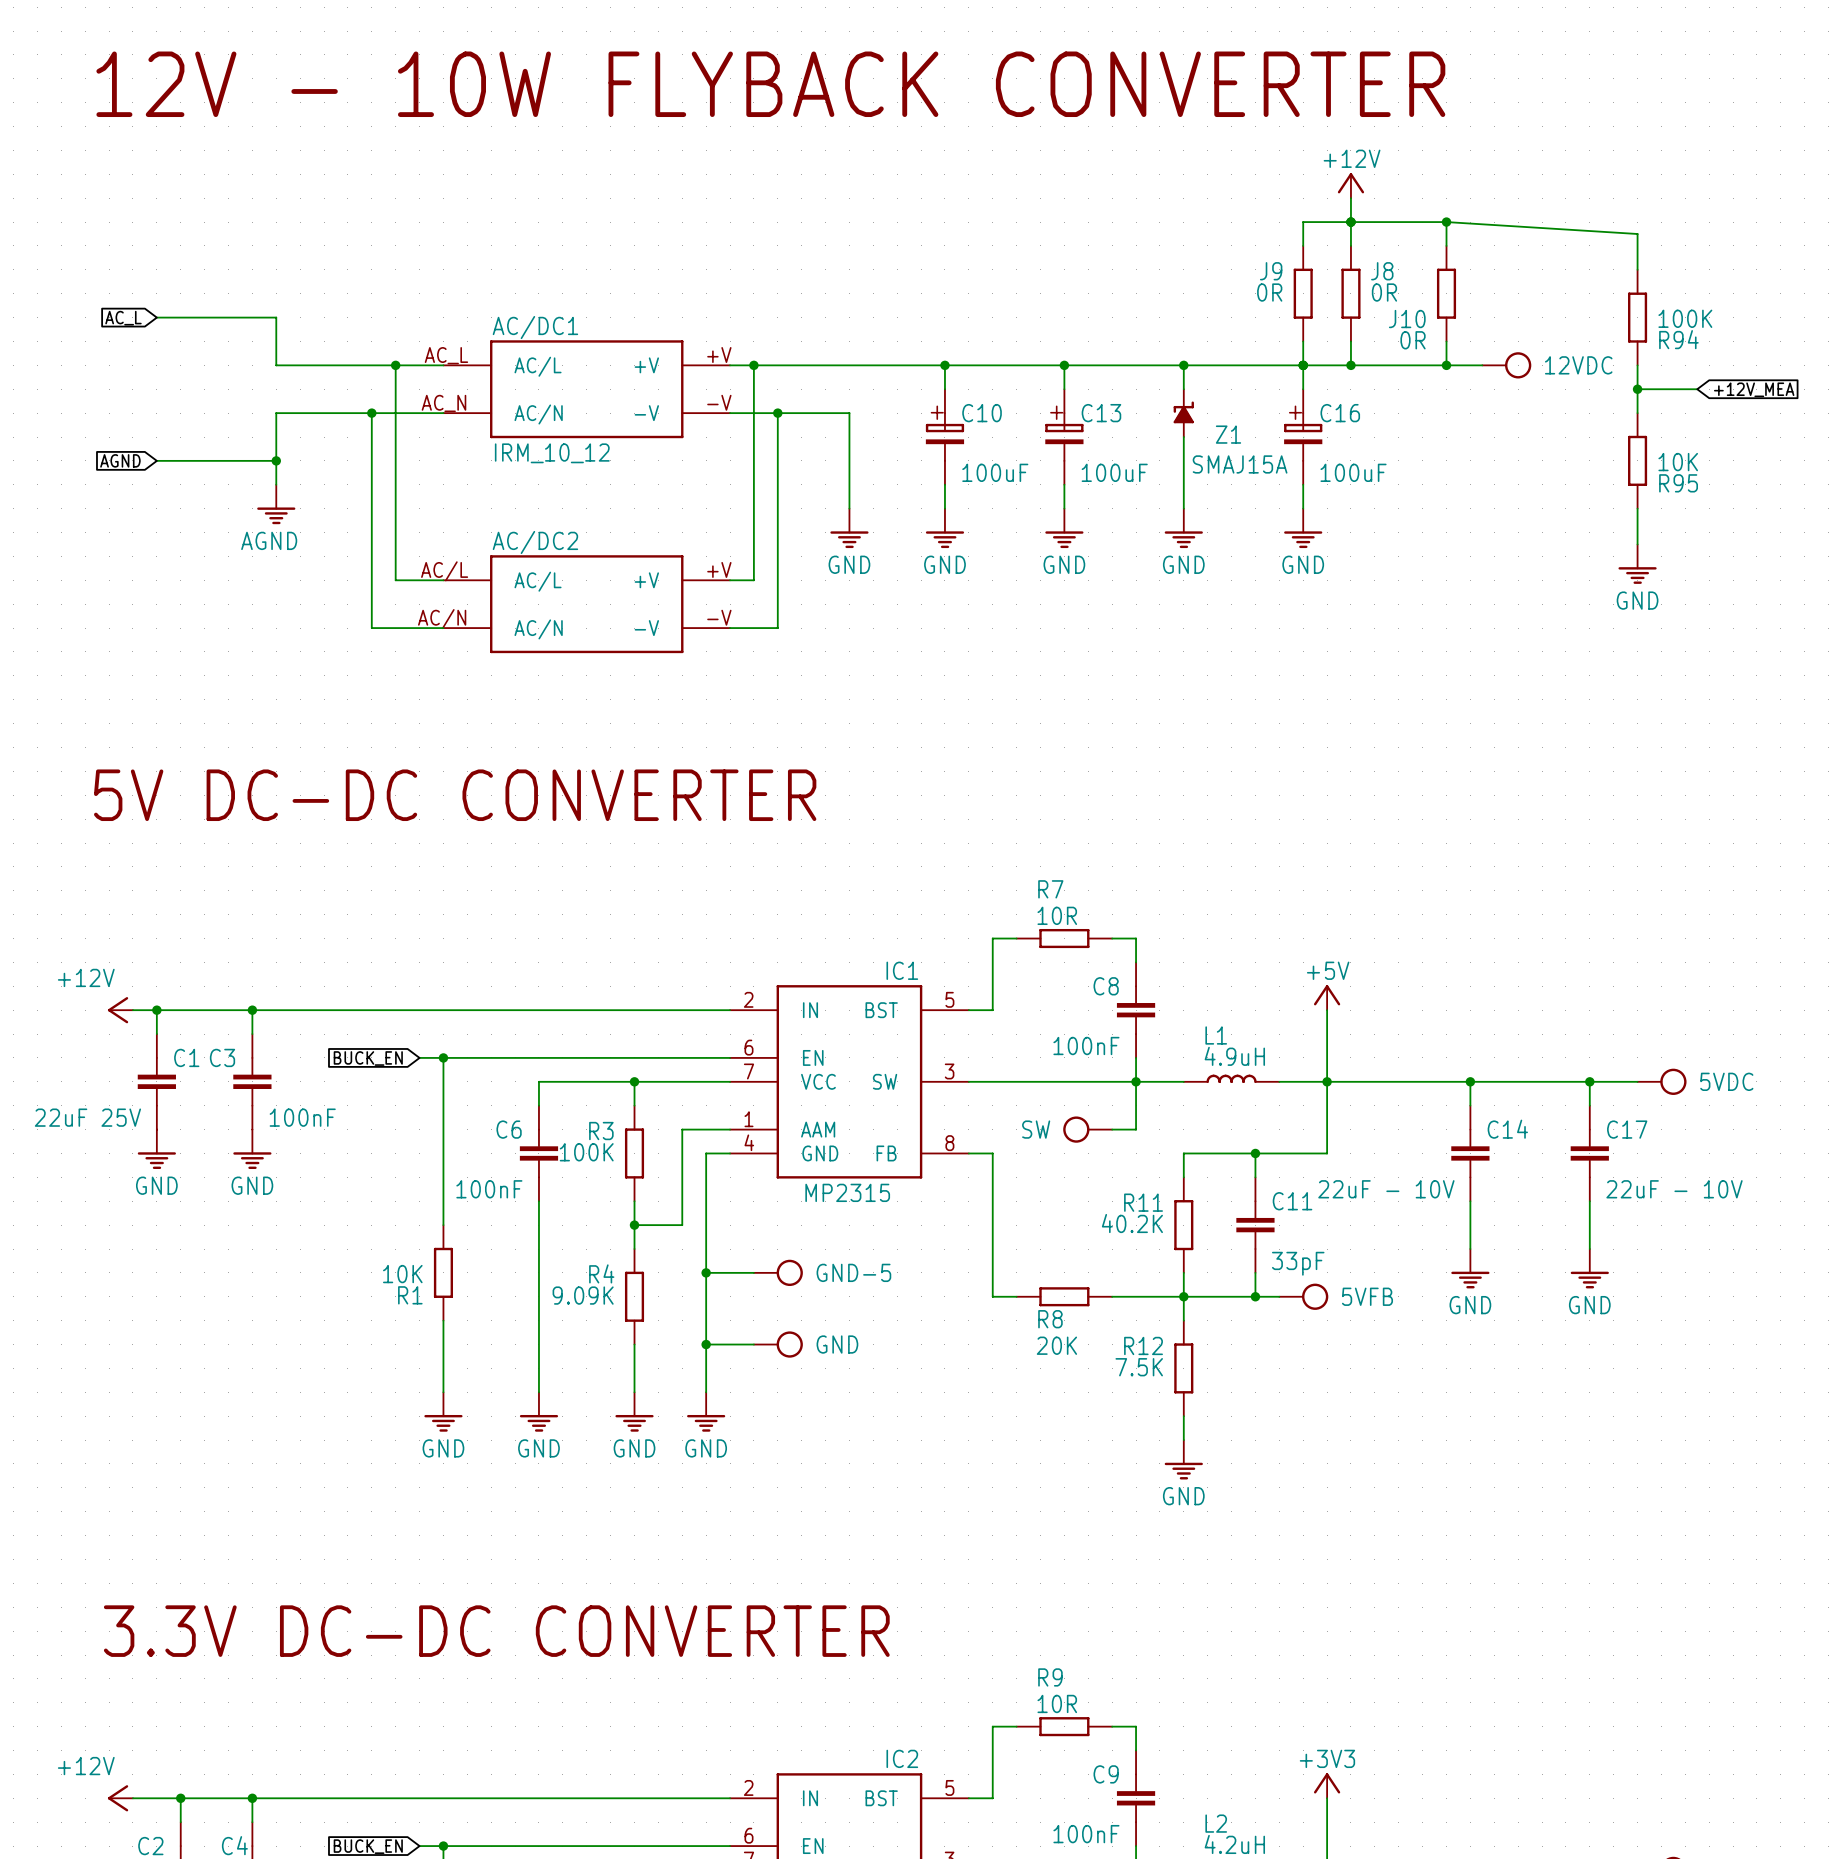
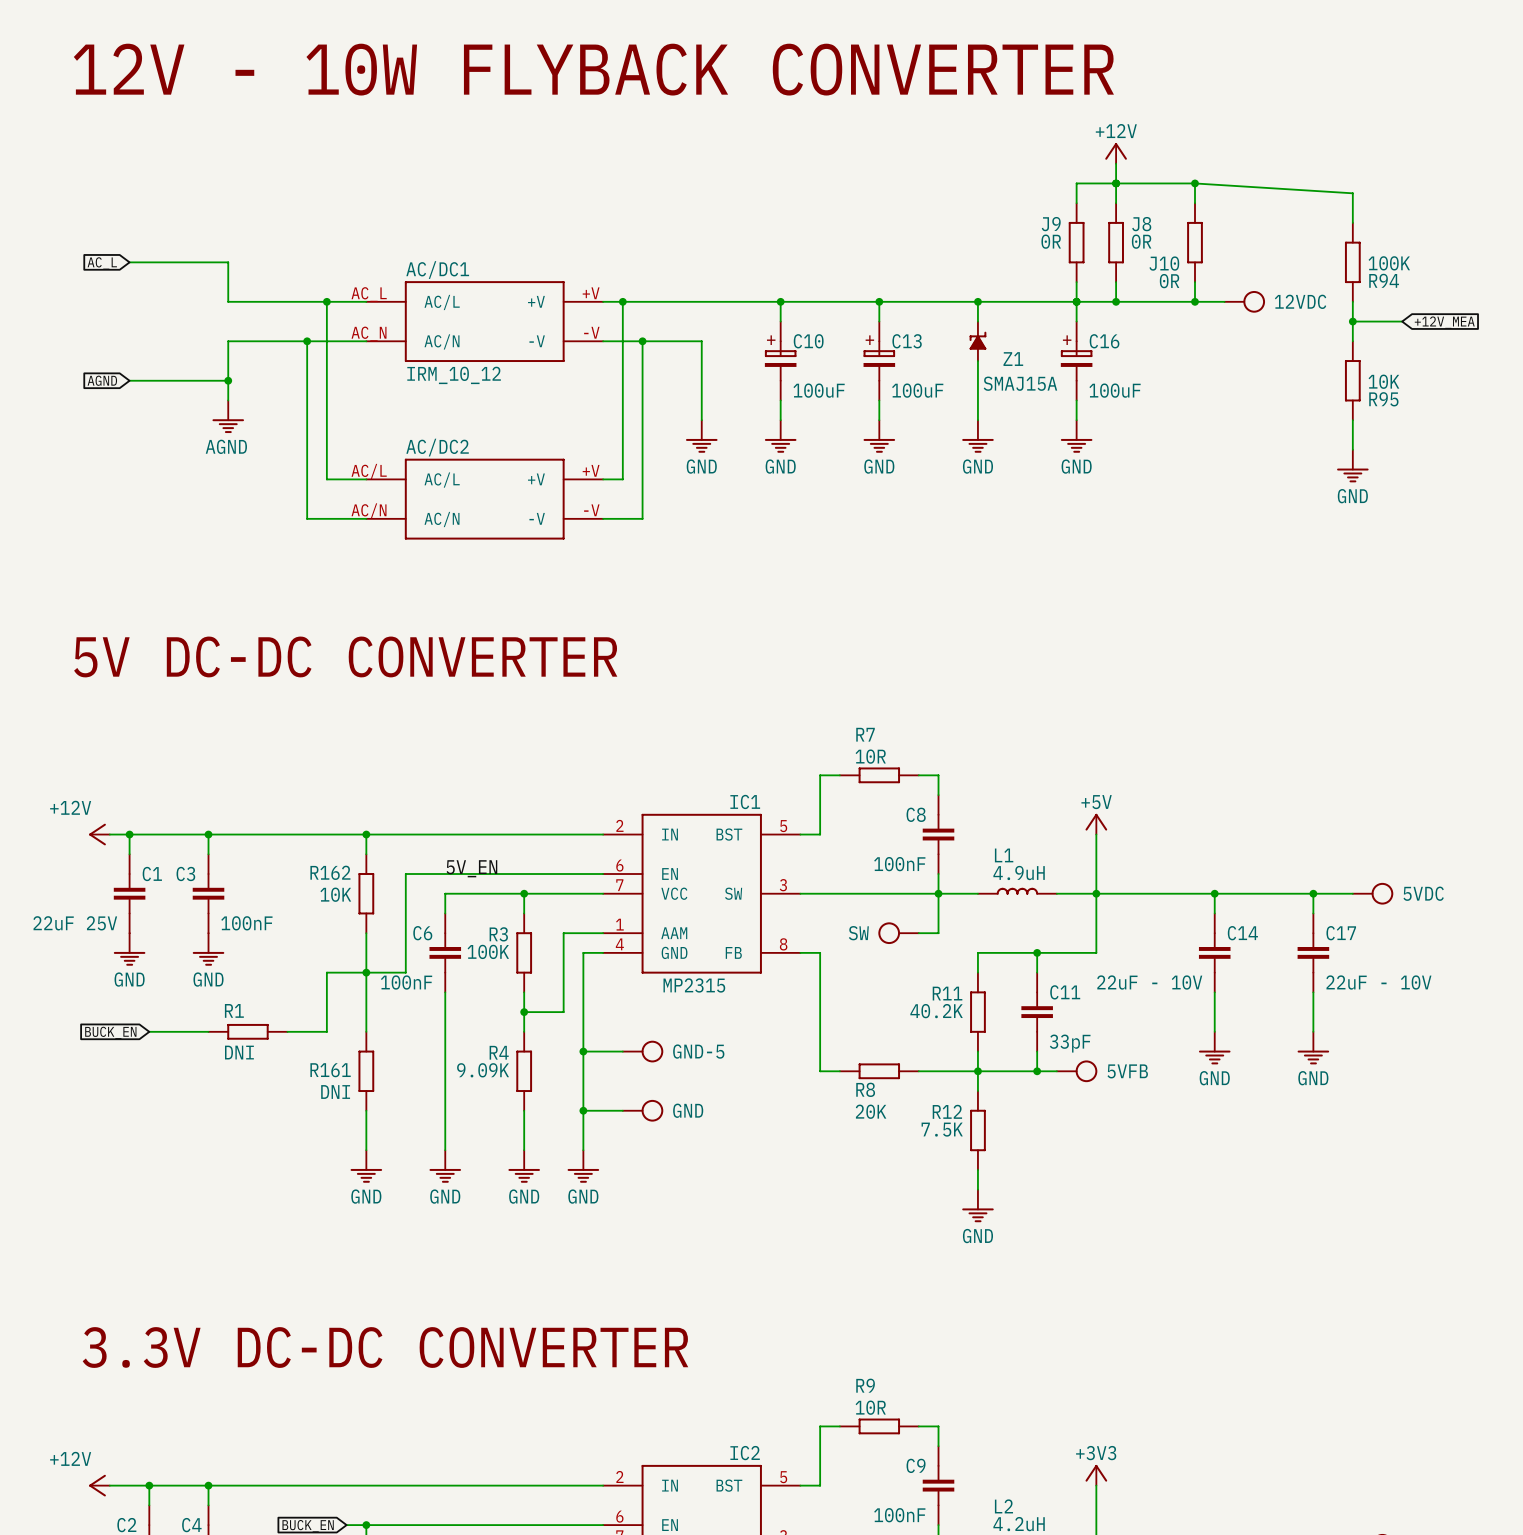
wire: none -> (366, 834) (366, 854)
label: none -> 5V_EN (471, 868)
wire: (419, 1057) (491, 1057) -> (287, 1031) (326, 1031) (326, 972) (405, 972) (405, 873)
wire: (443, 1057) (443, 1129) -> none
junction position: (443, 1057) -> (366, 834)
global label: BUCK_EN (368, 1058) -> none
R162: none -> 10K (366, 893)
junction: none -> (366, 972)
global label: none -> BUCK_EN (110, 1032)
wire: none -> (149, 1031) (208, 1031)
R1 rotation: 0° (443, 1272) -> 90° clockwise (247, 1031)
R1 position: (443, 1272) -> (247, 1031)
R1 value: 10K (402, 1274) -> DNI (239, 1052)
R161: none -> DNI (366, 1071)

